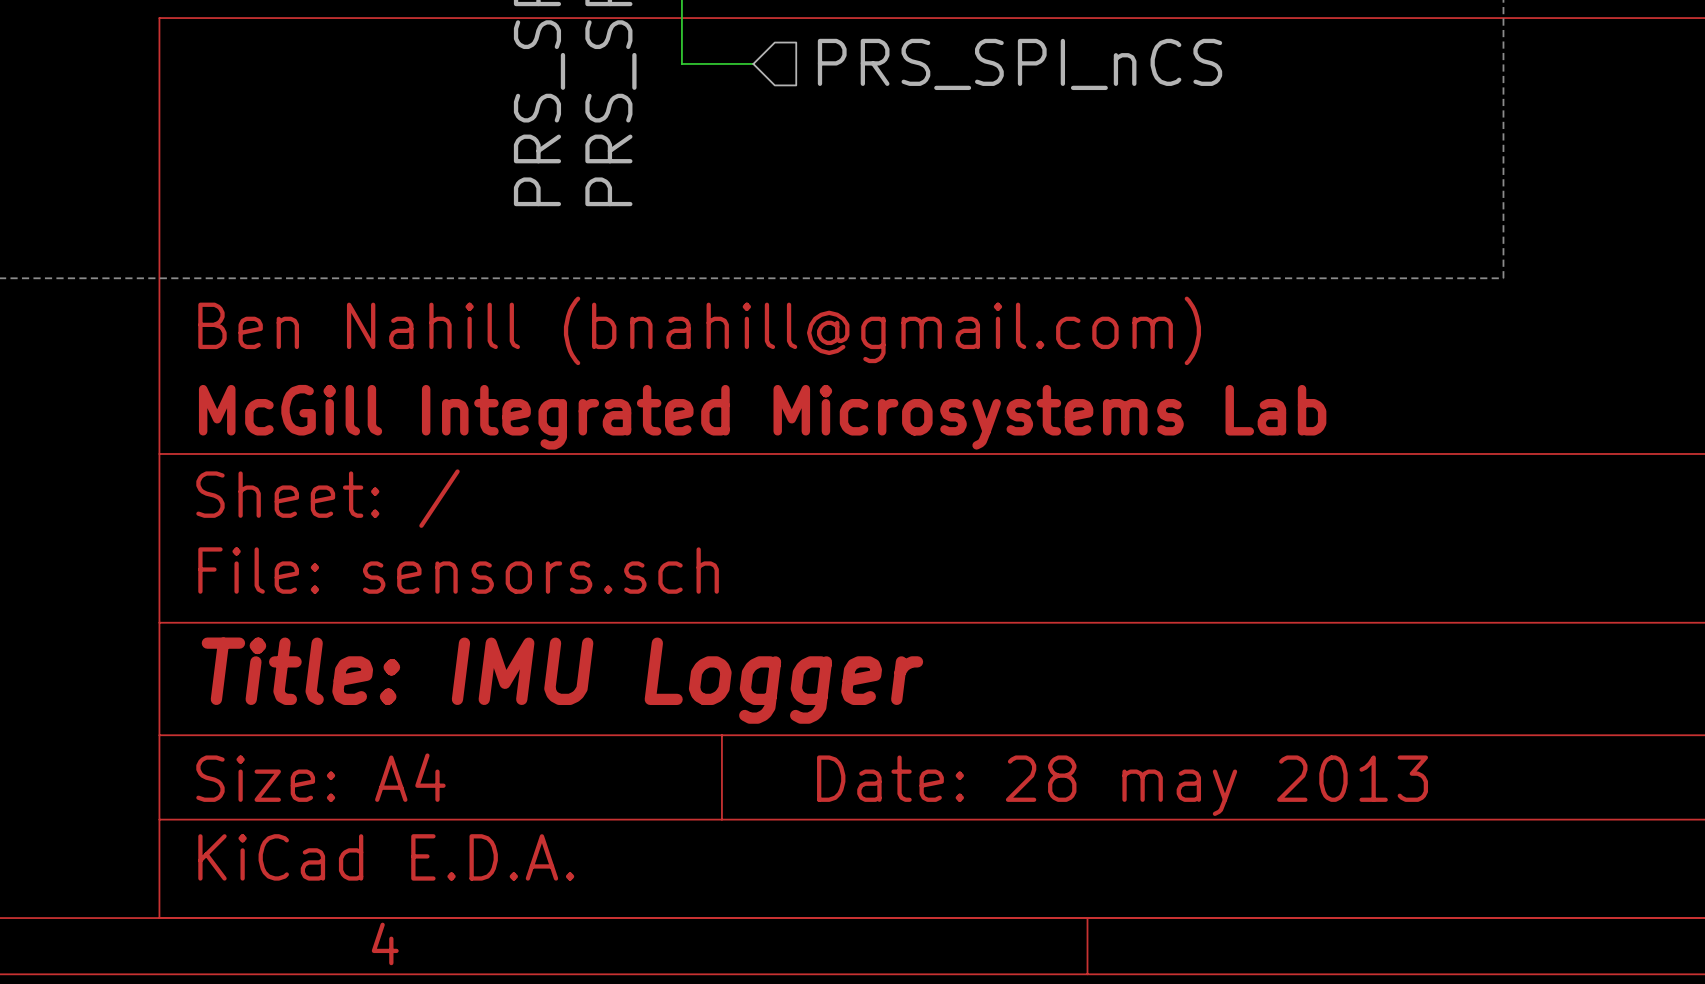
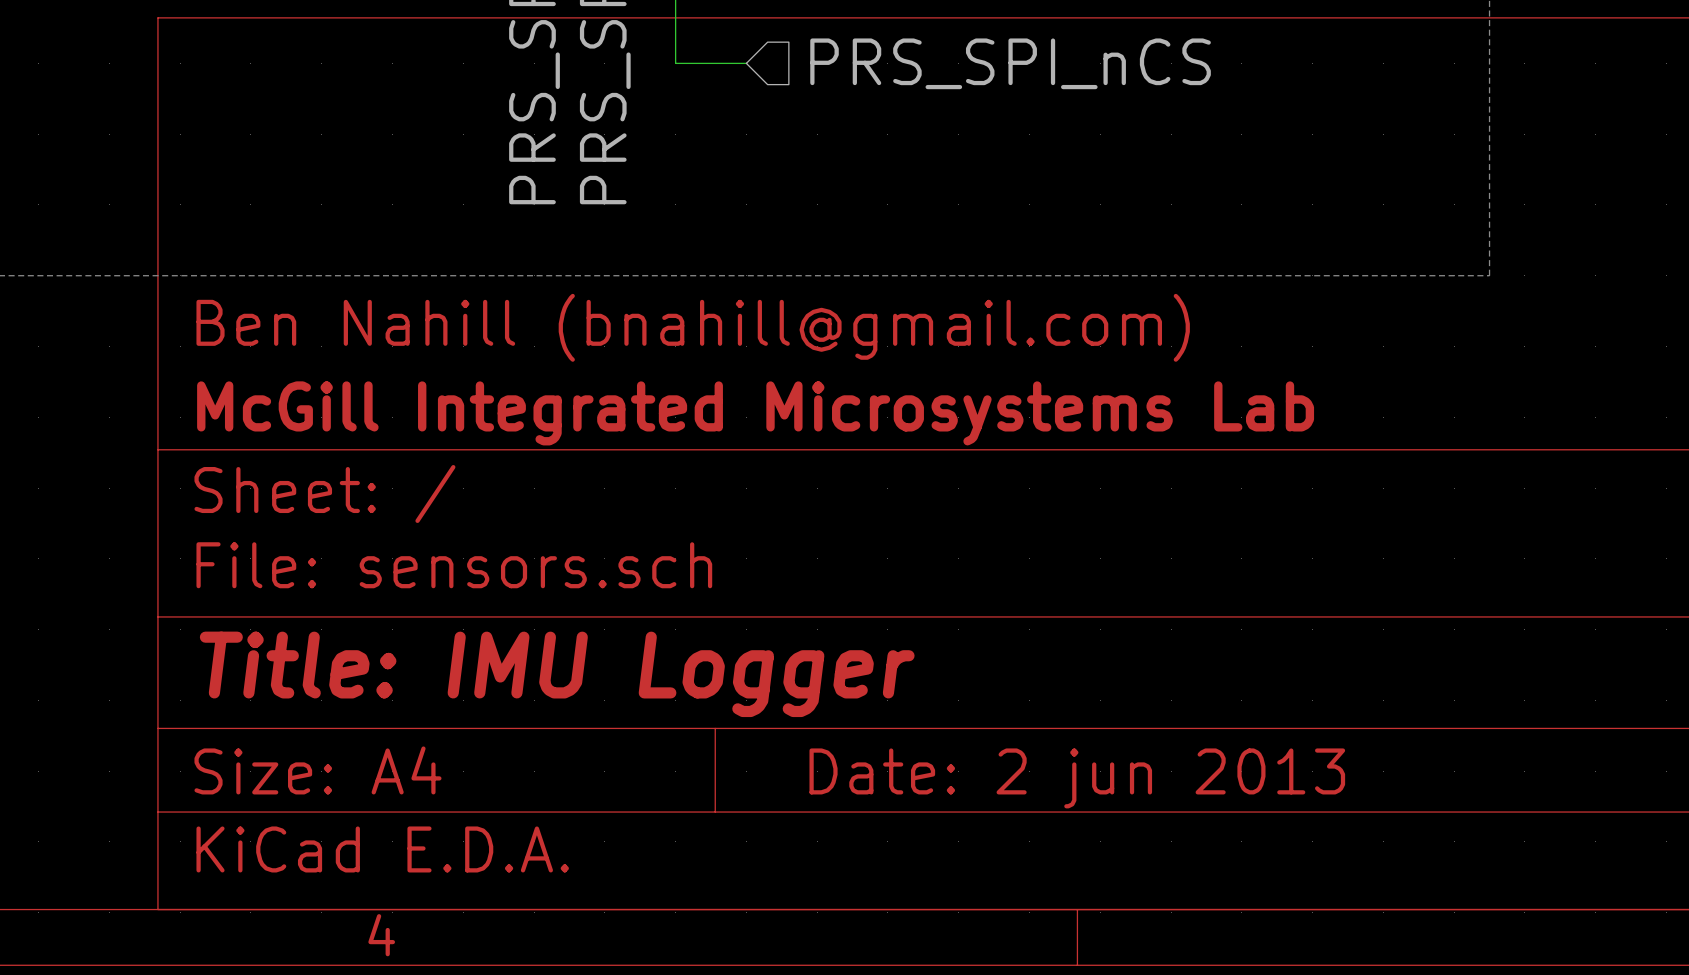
title block: Date: 28 may 2013 (1122, 785) -> Date: 2 jun 2013 (1077, 778)

